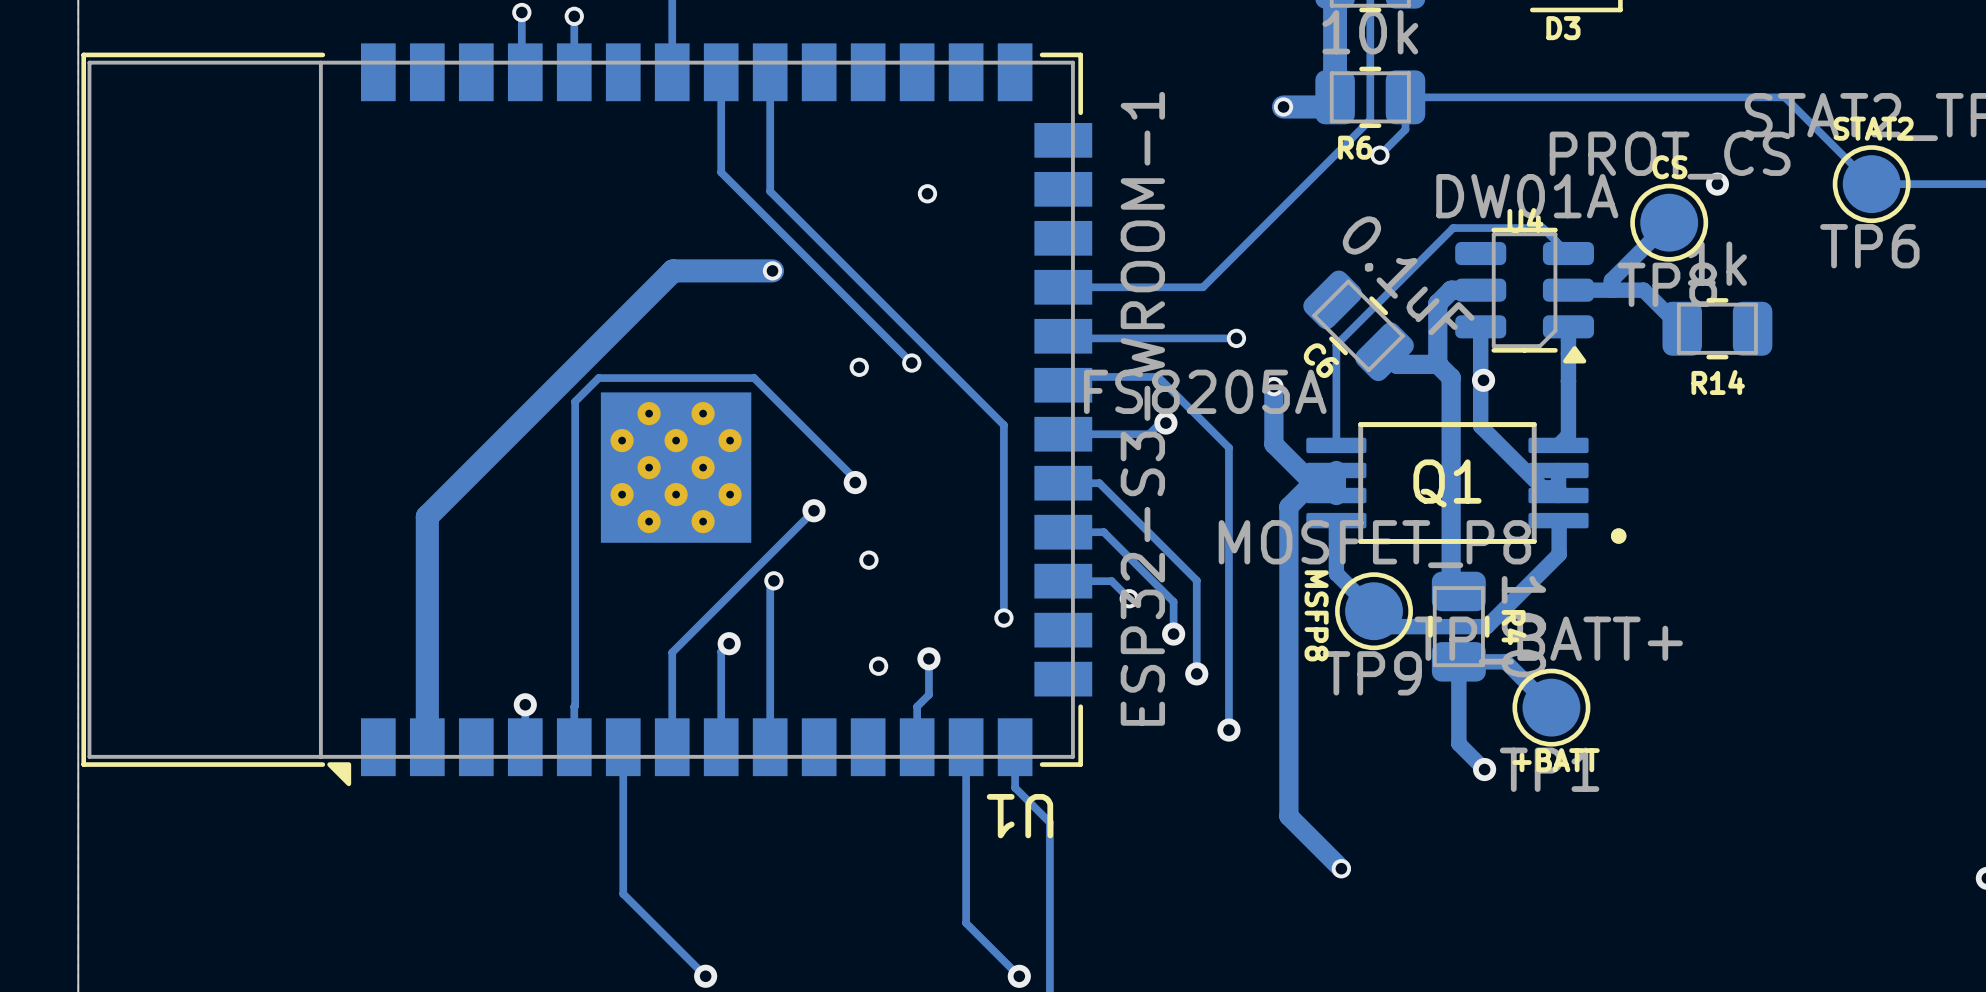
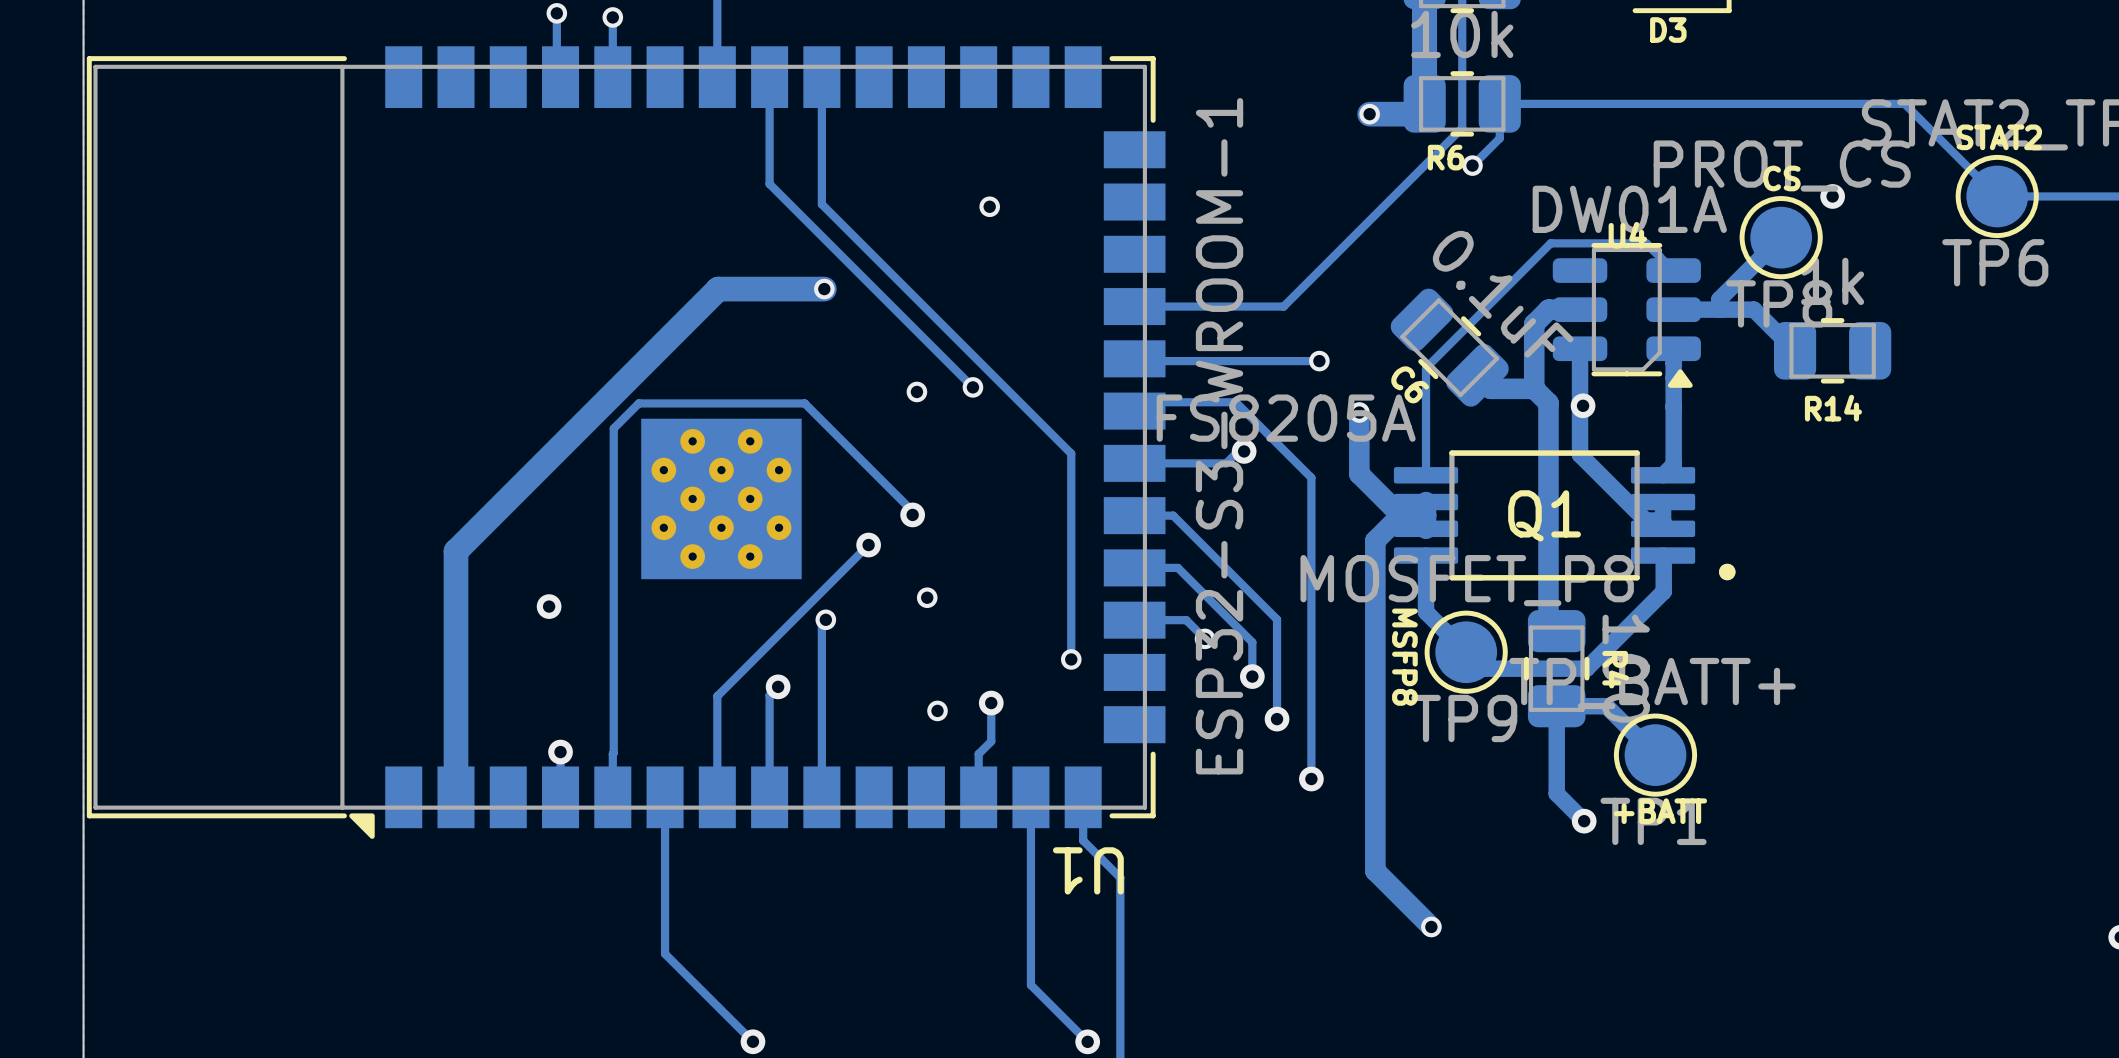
via: none -> (549, 606)

